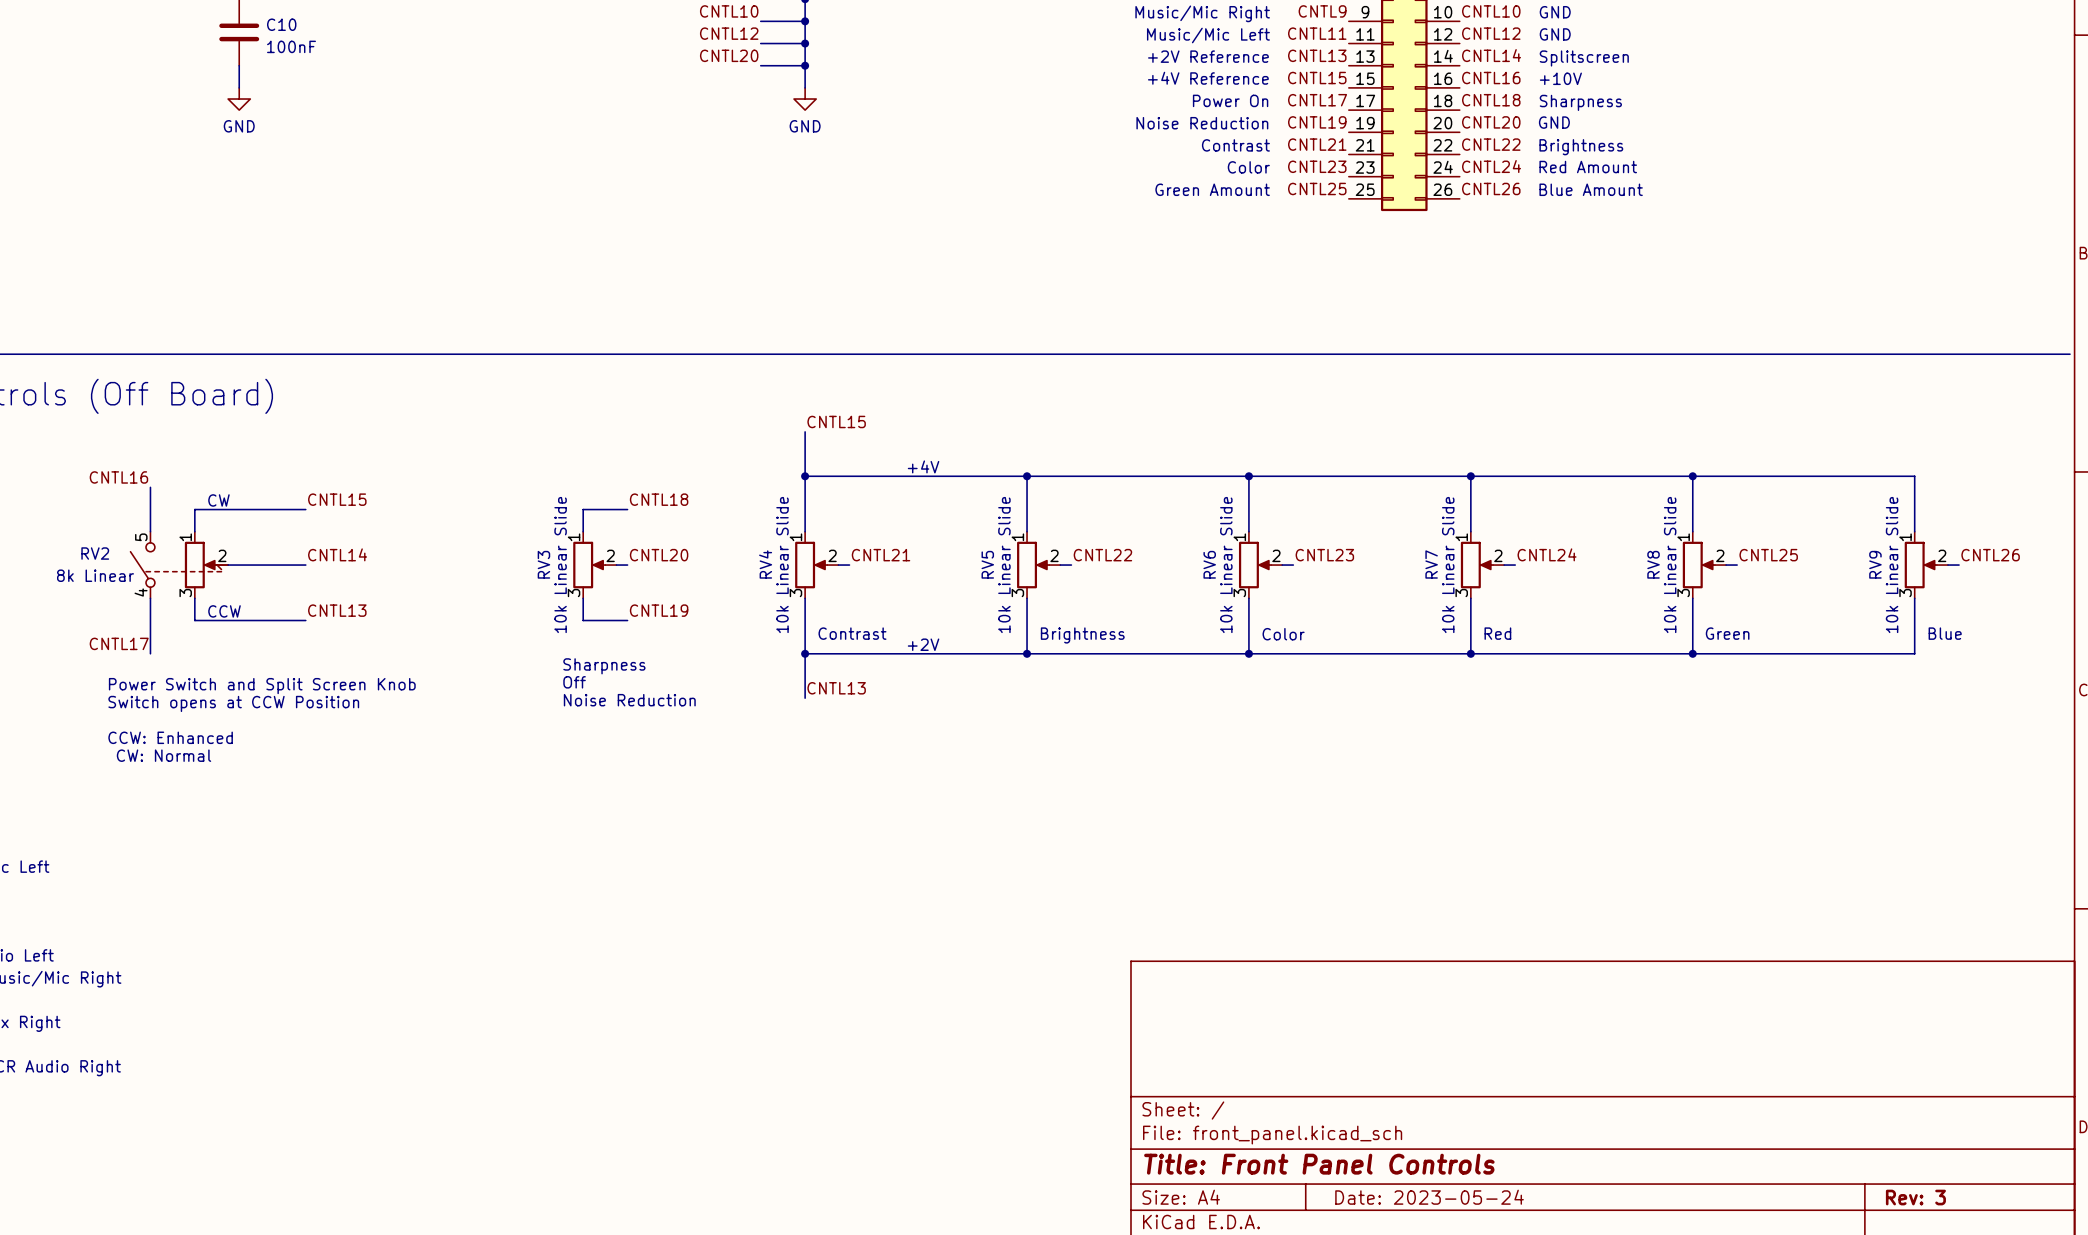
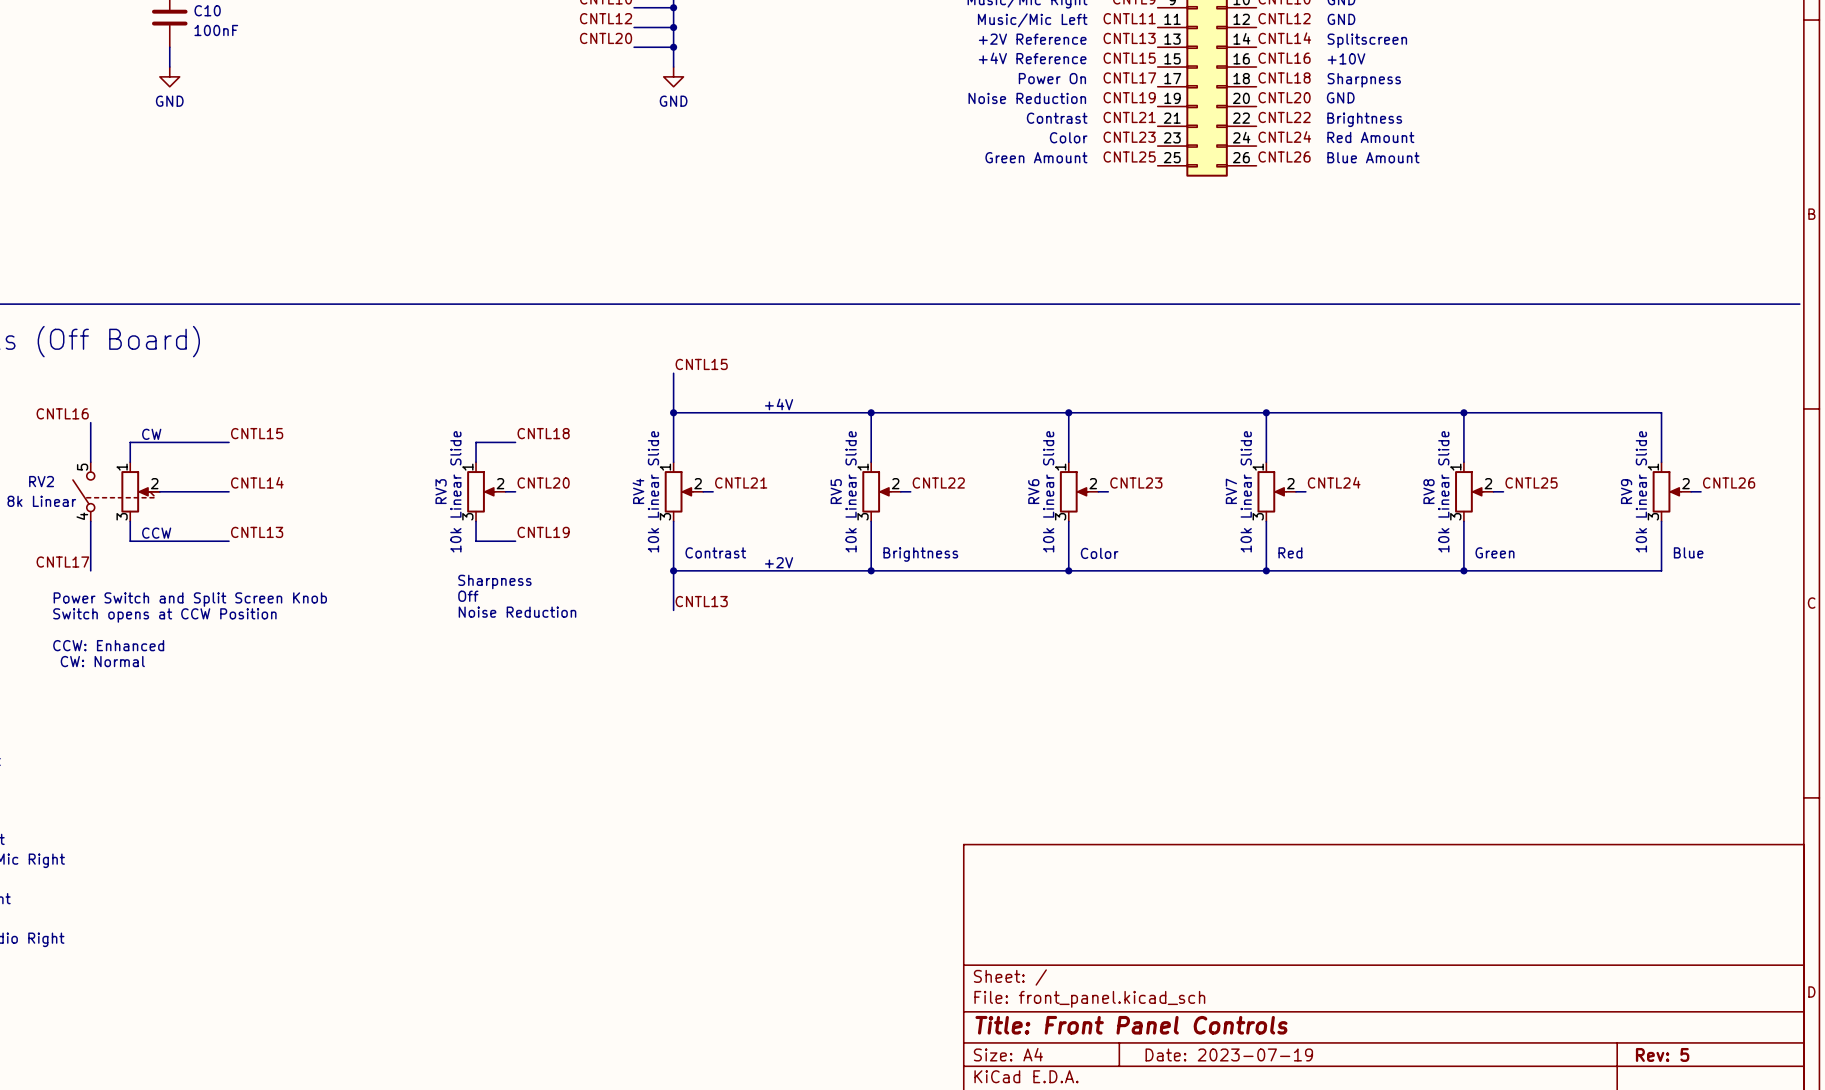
title block: Date: 2023-05-24 (1429, 1197) -> Date: 2023-07-19 (1229, 1054)
title block: Rev: 3 (1915, 1197) -> Rev: 5 (1662, 1054)

